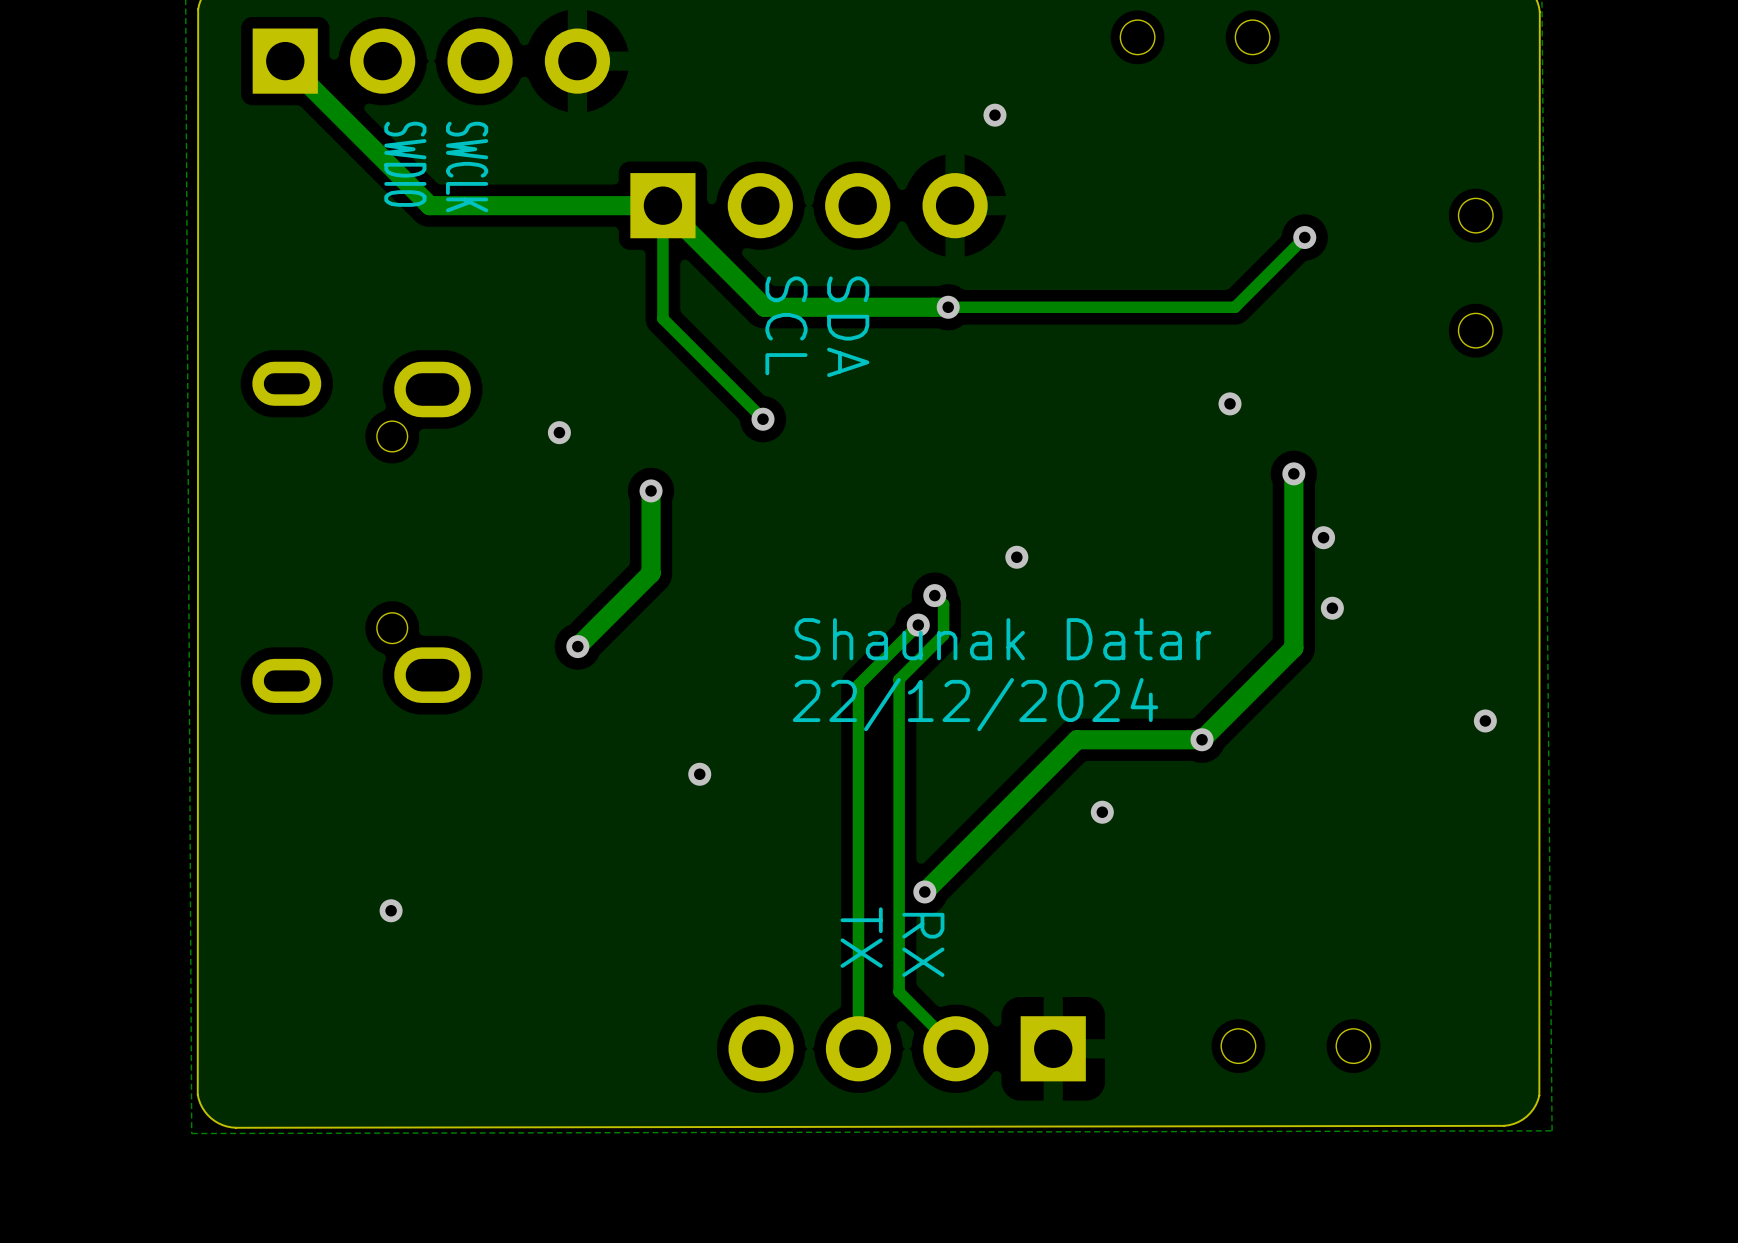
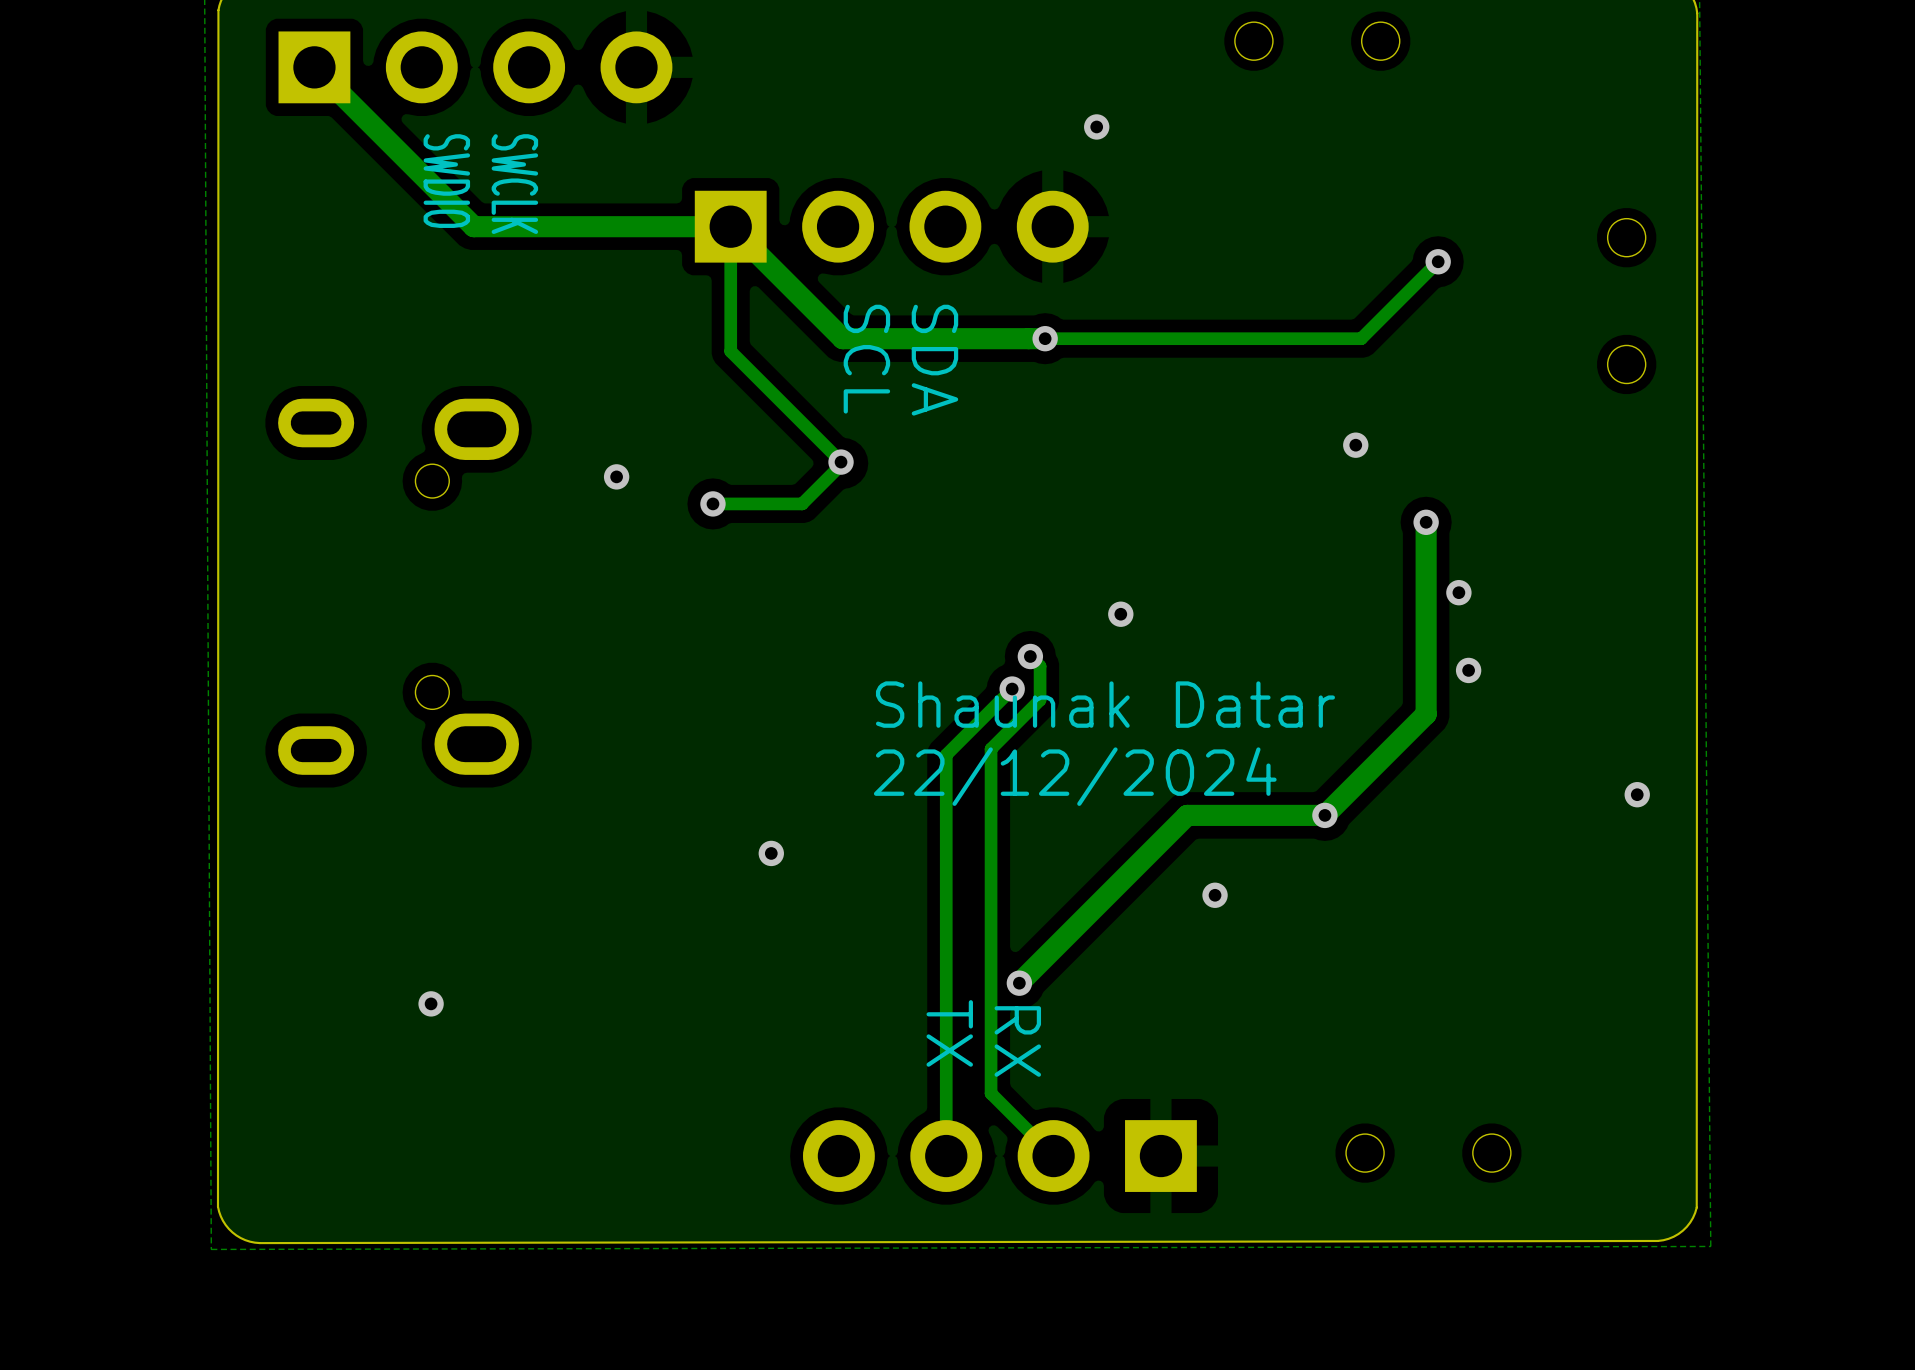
track: none -> (842, 463) (802, 503) (712, 503)
track: (651, 490) (651, 573) (577, 646) -> none
via position: (651, 490) -> (712, 503)
via: (577, 646) -> none

